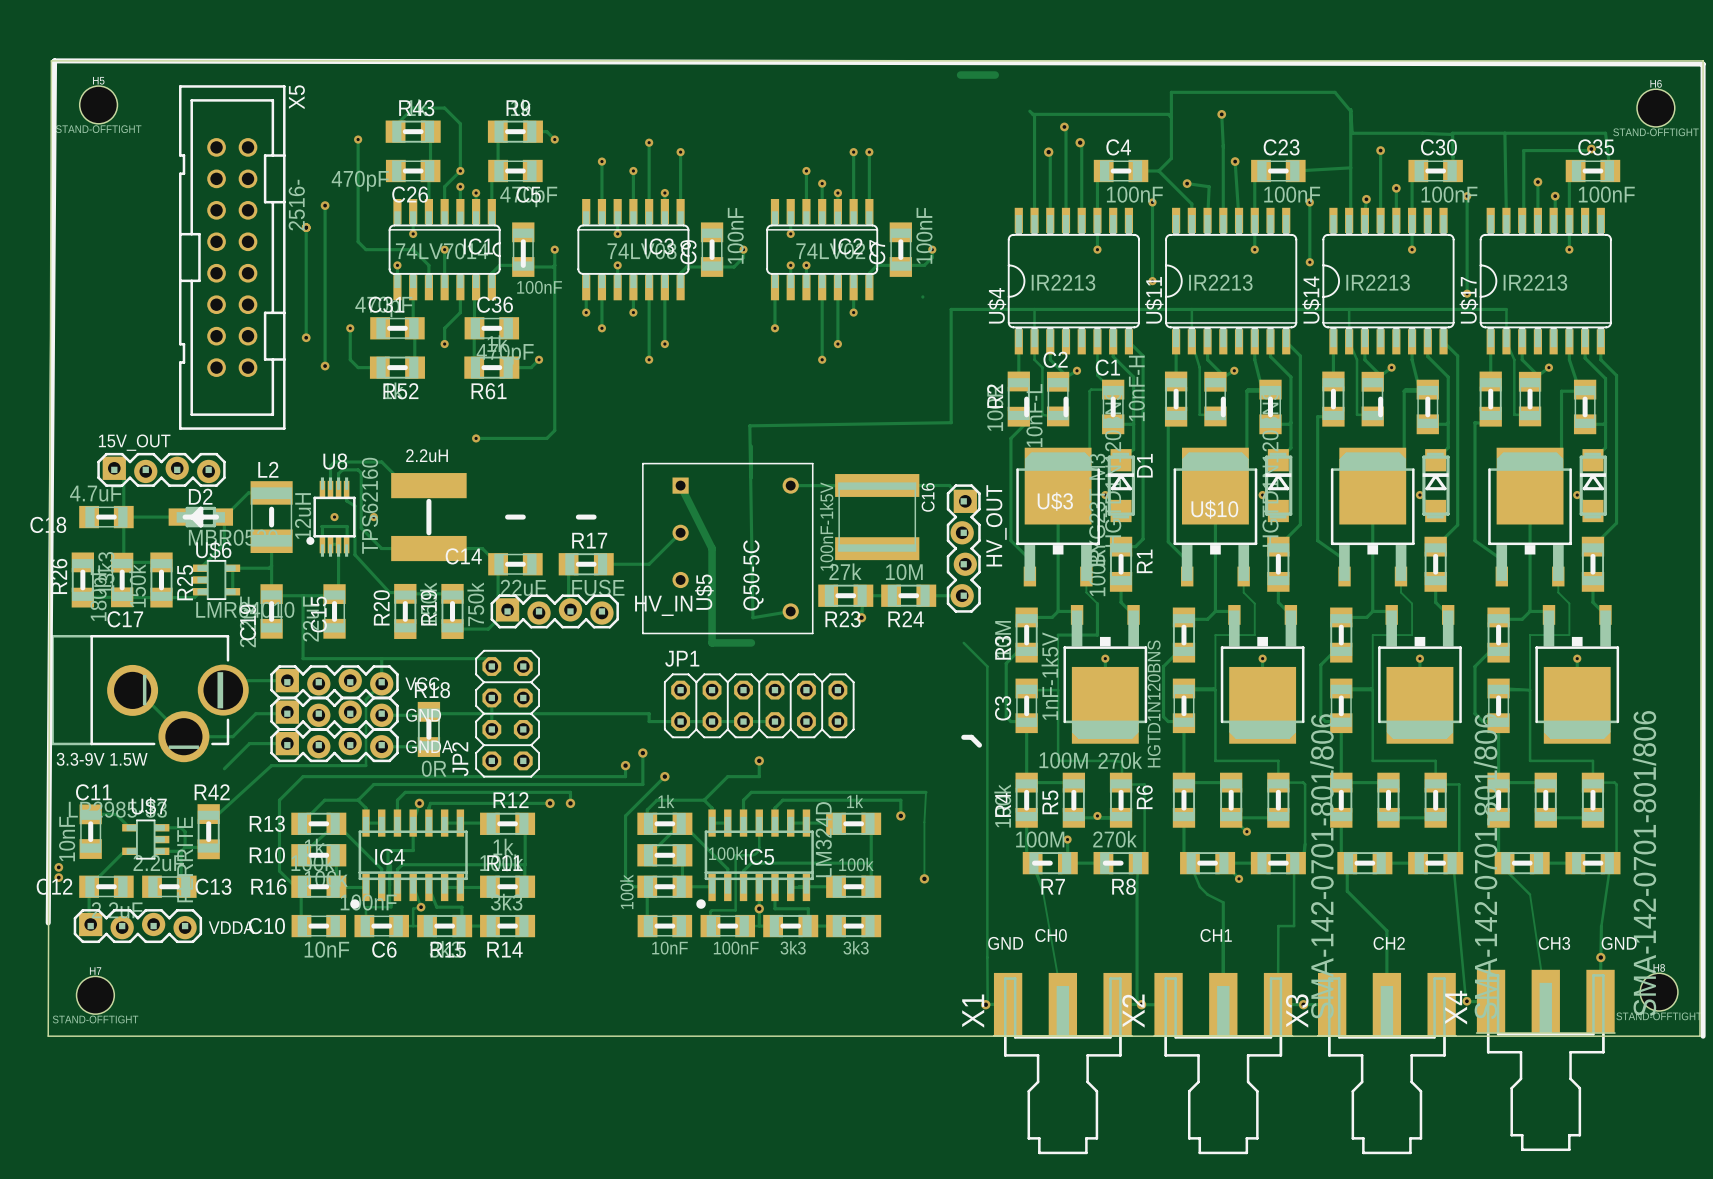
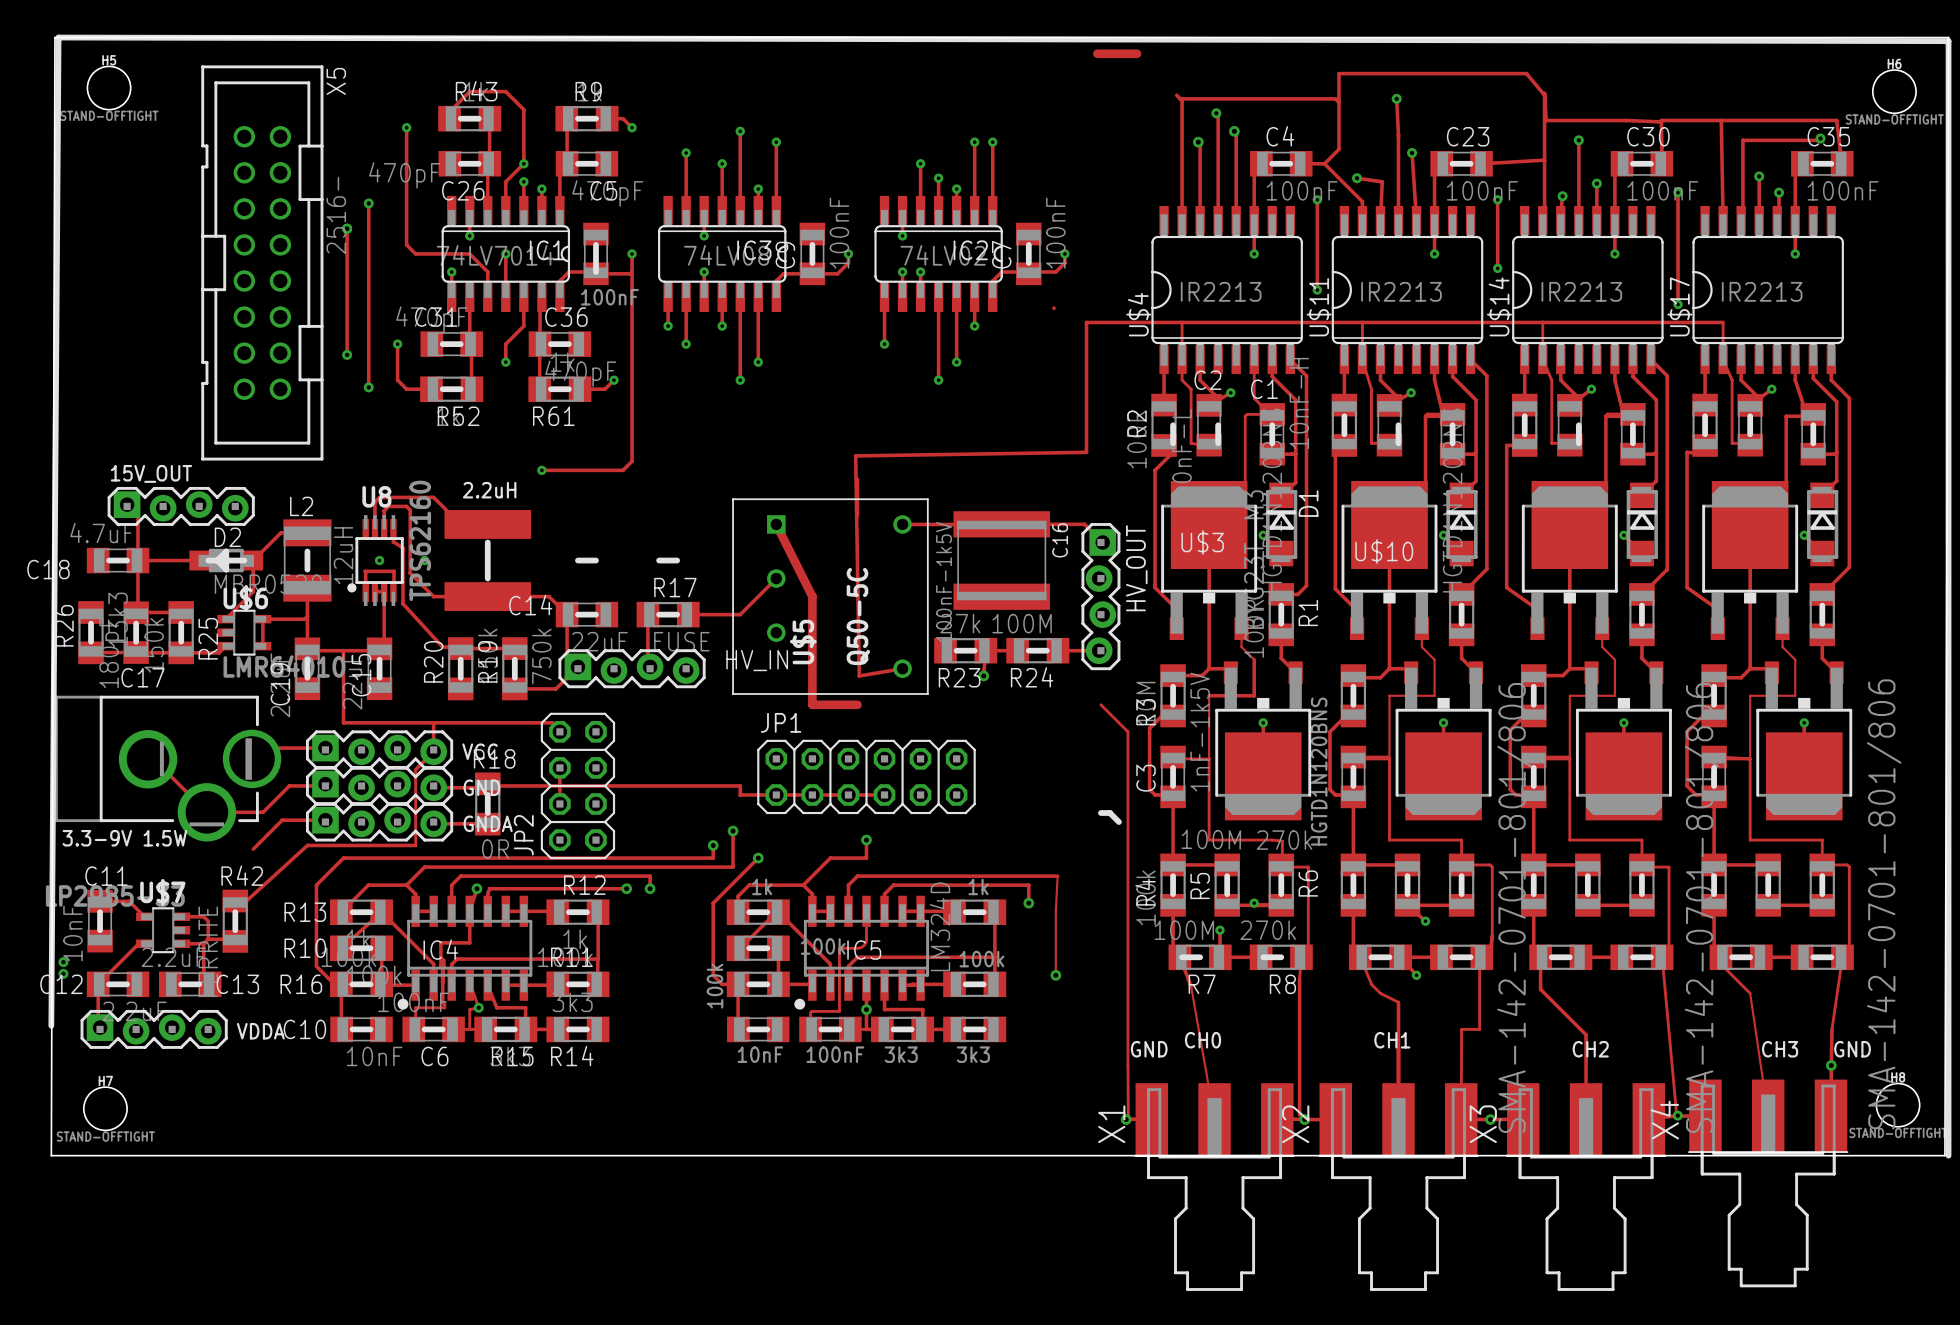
R24 value: 10M (904, 572) -> 100M (1022, 623)

